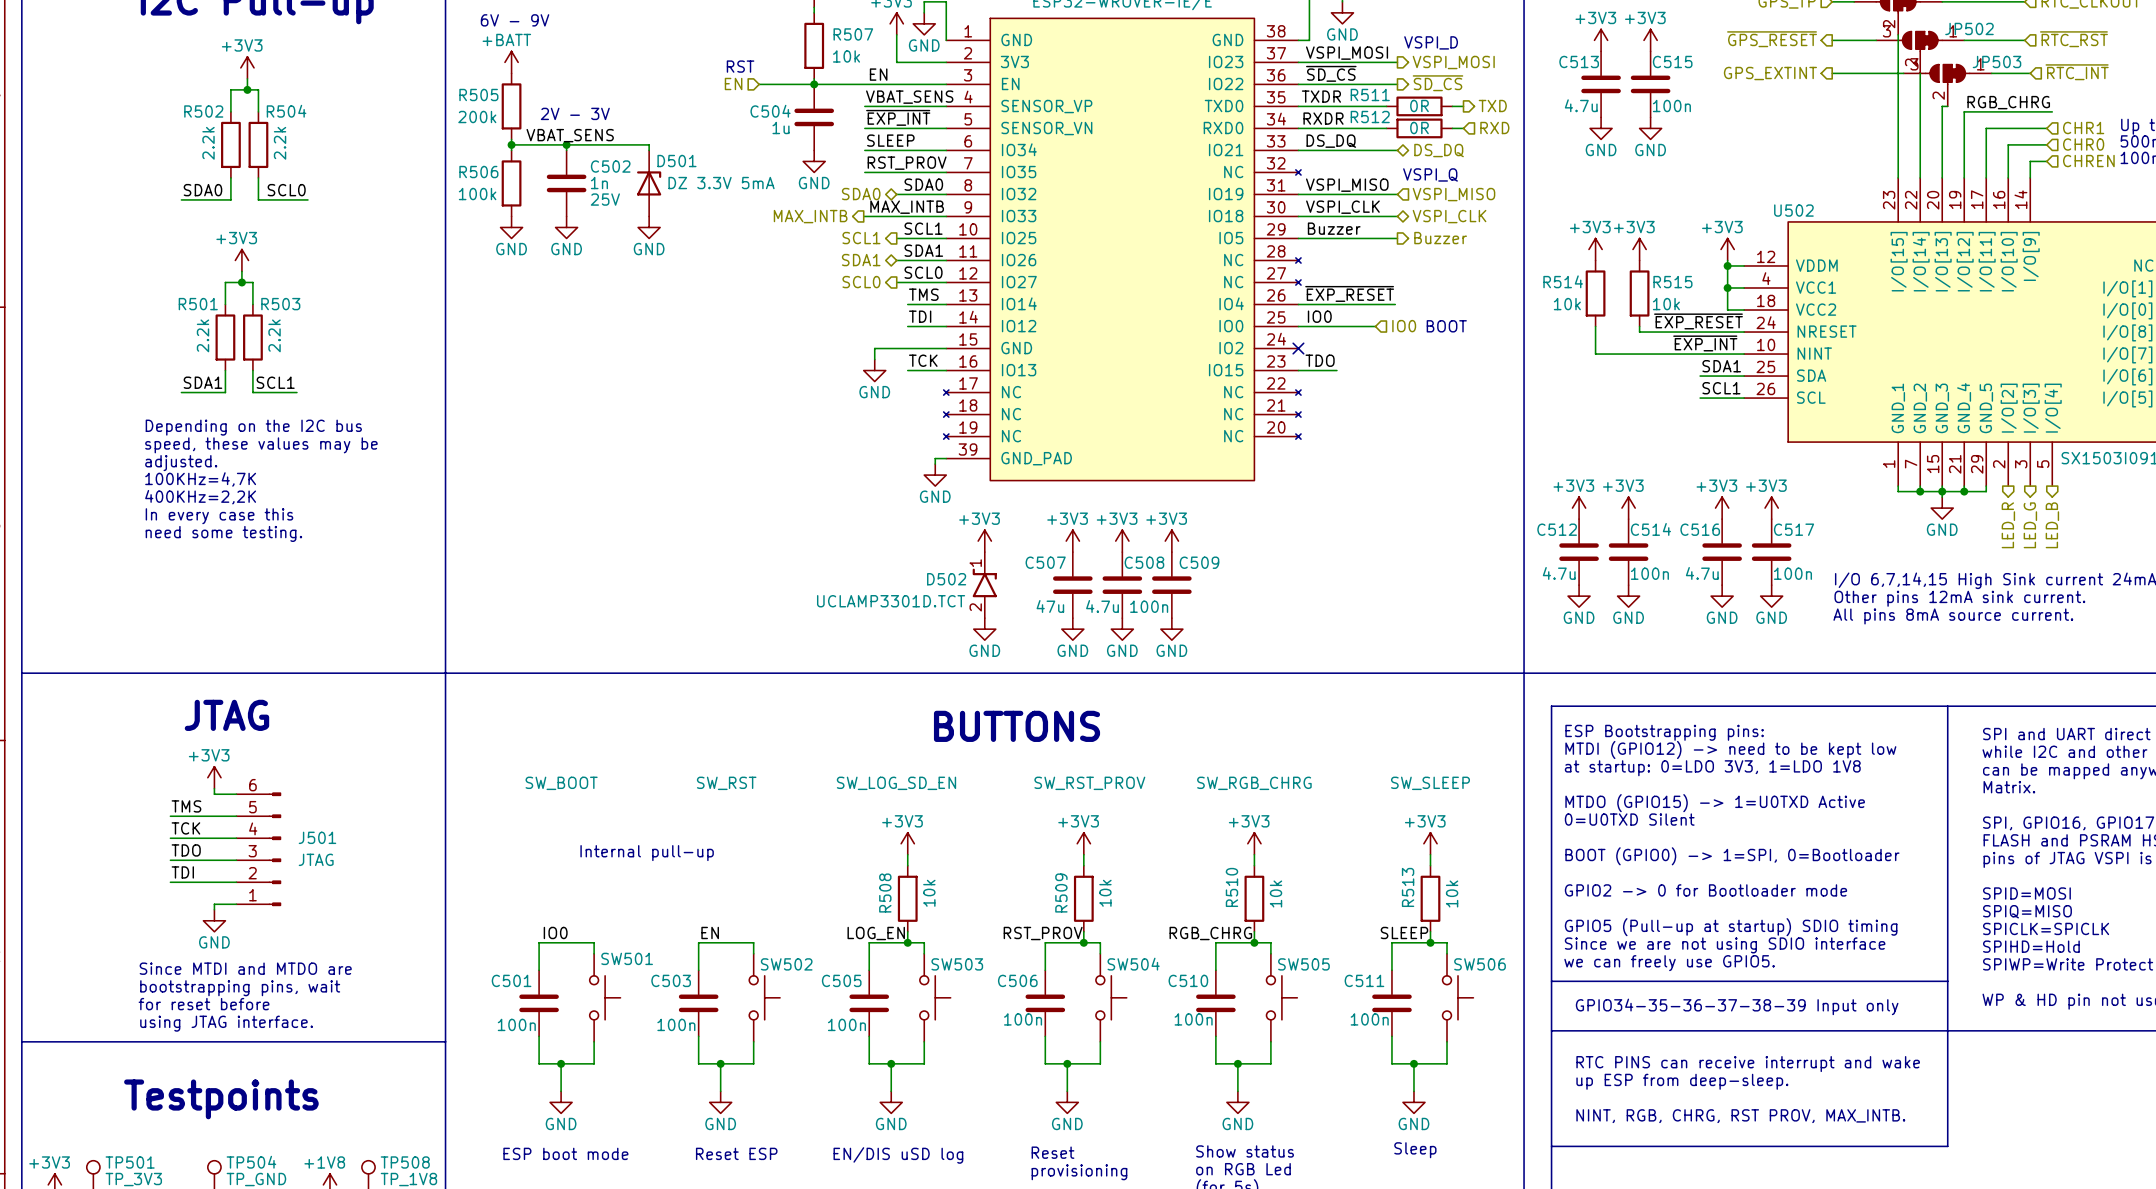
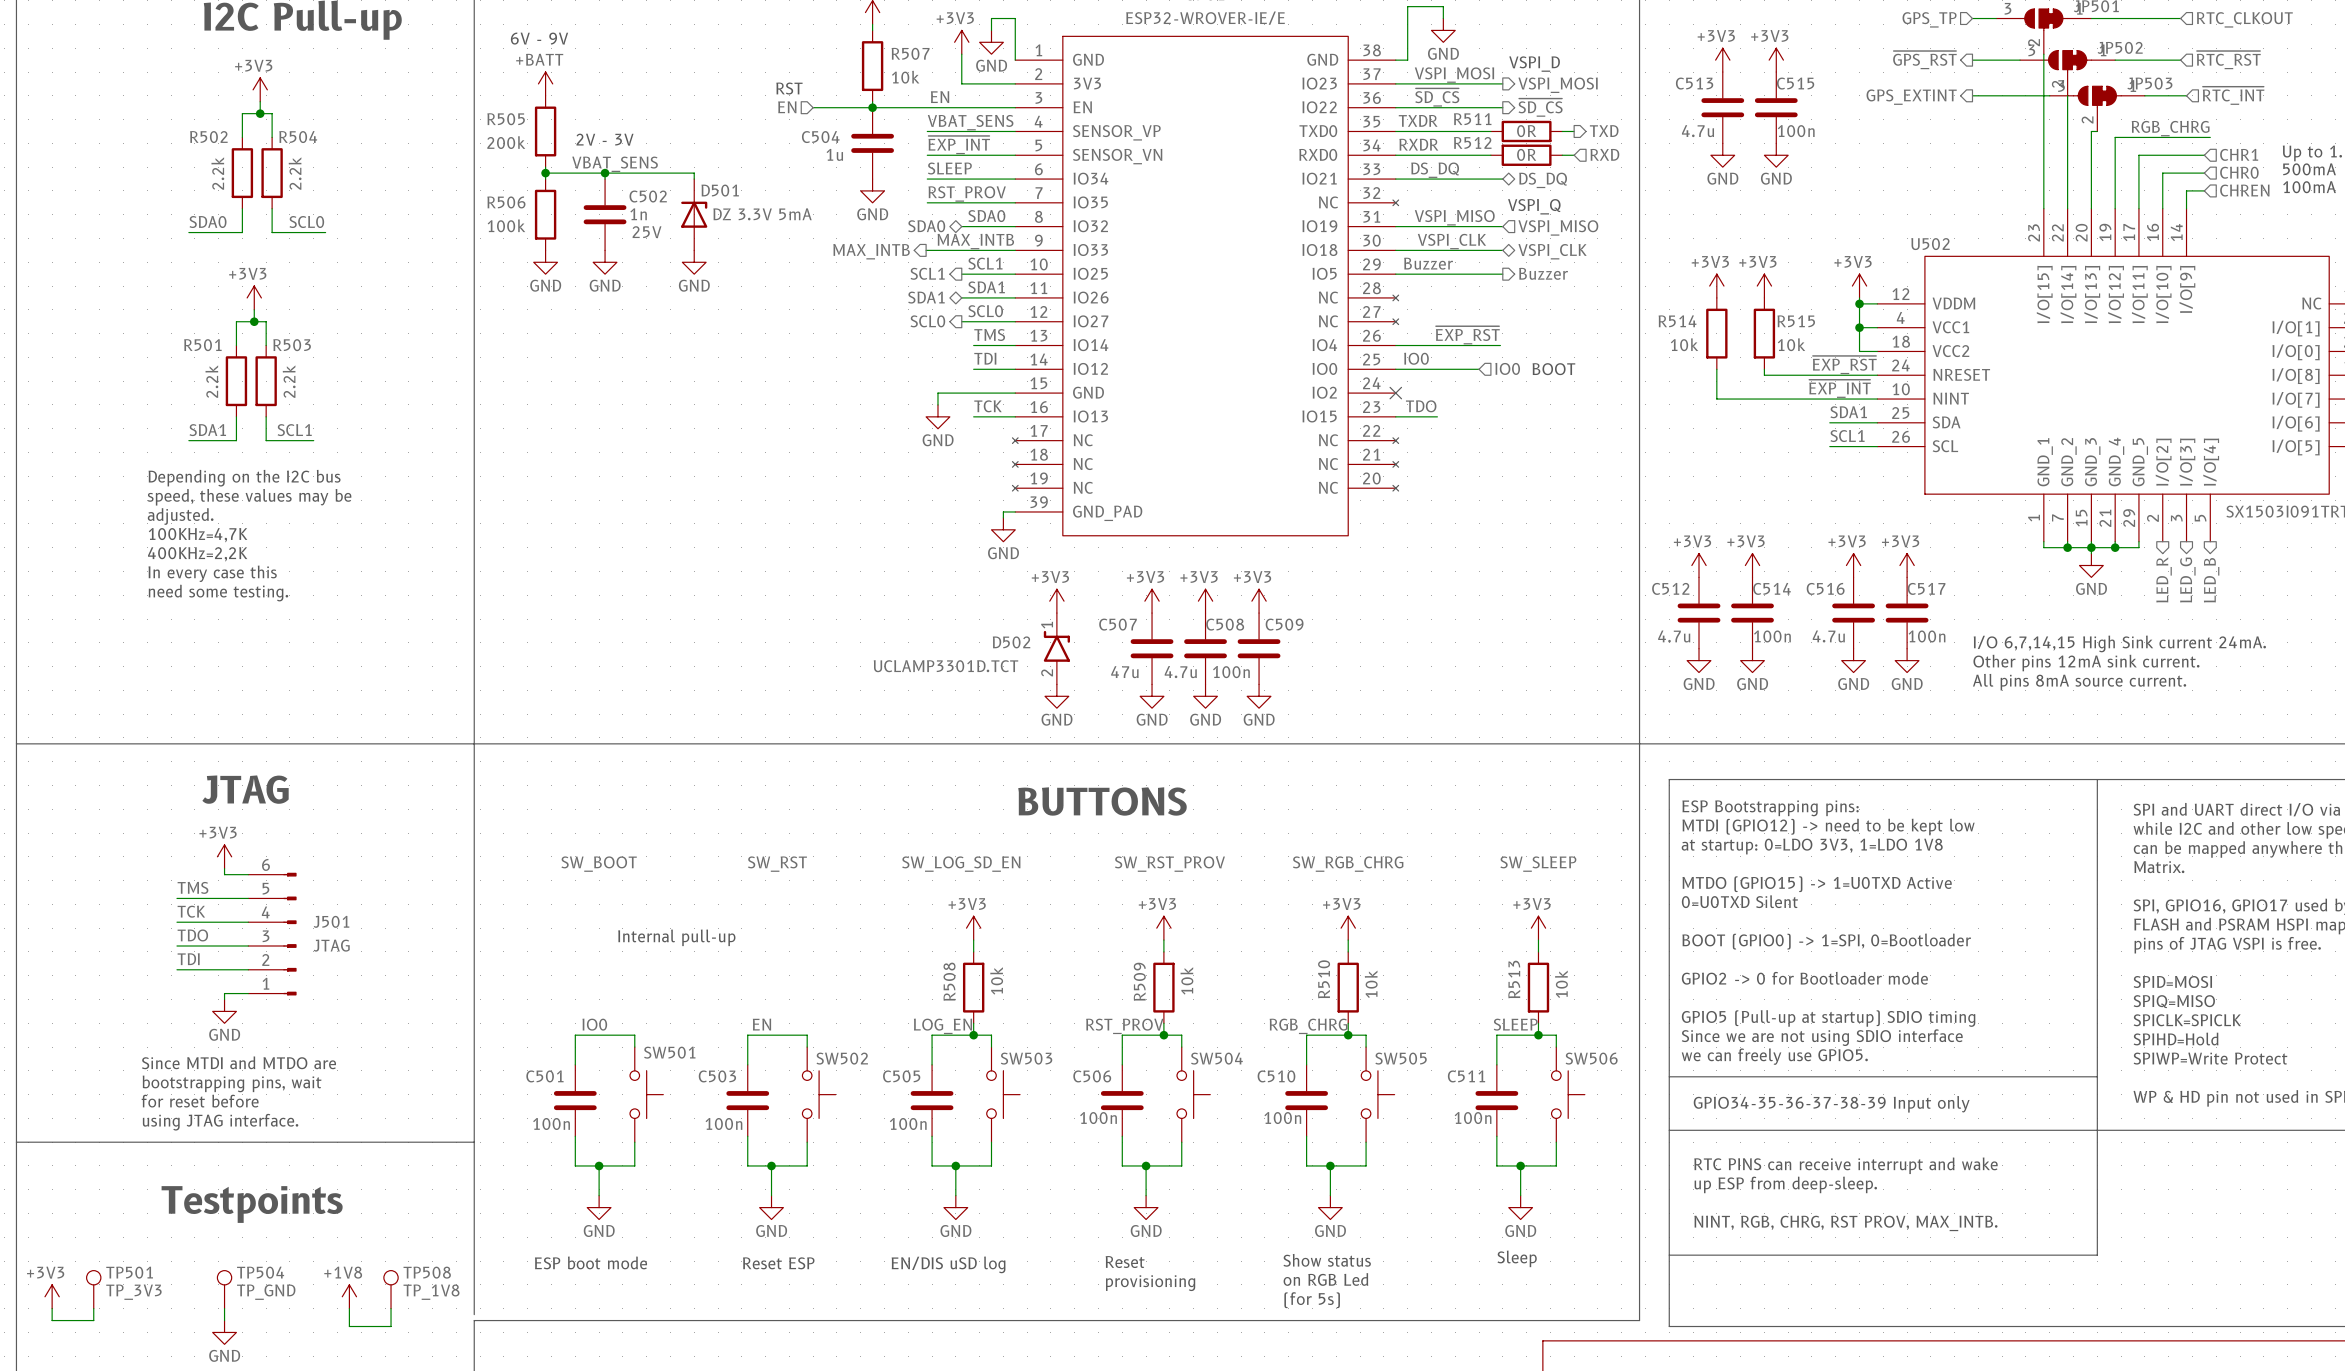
hierarchical label: ~{GPS_RESET} (1772, 39) -> ~{GPS_RST} (1924, 60)
label: ~{EXP_RESET} (1349, 293) -> ~{EXP_RST} (1467, 335)
label: ~{EXP_RESET} (1698, 321) -> ~{EXP_RST} (1844, 365)

